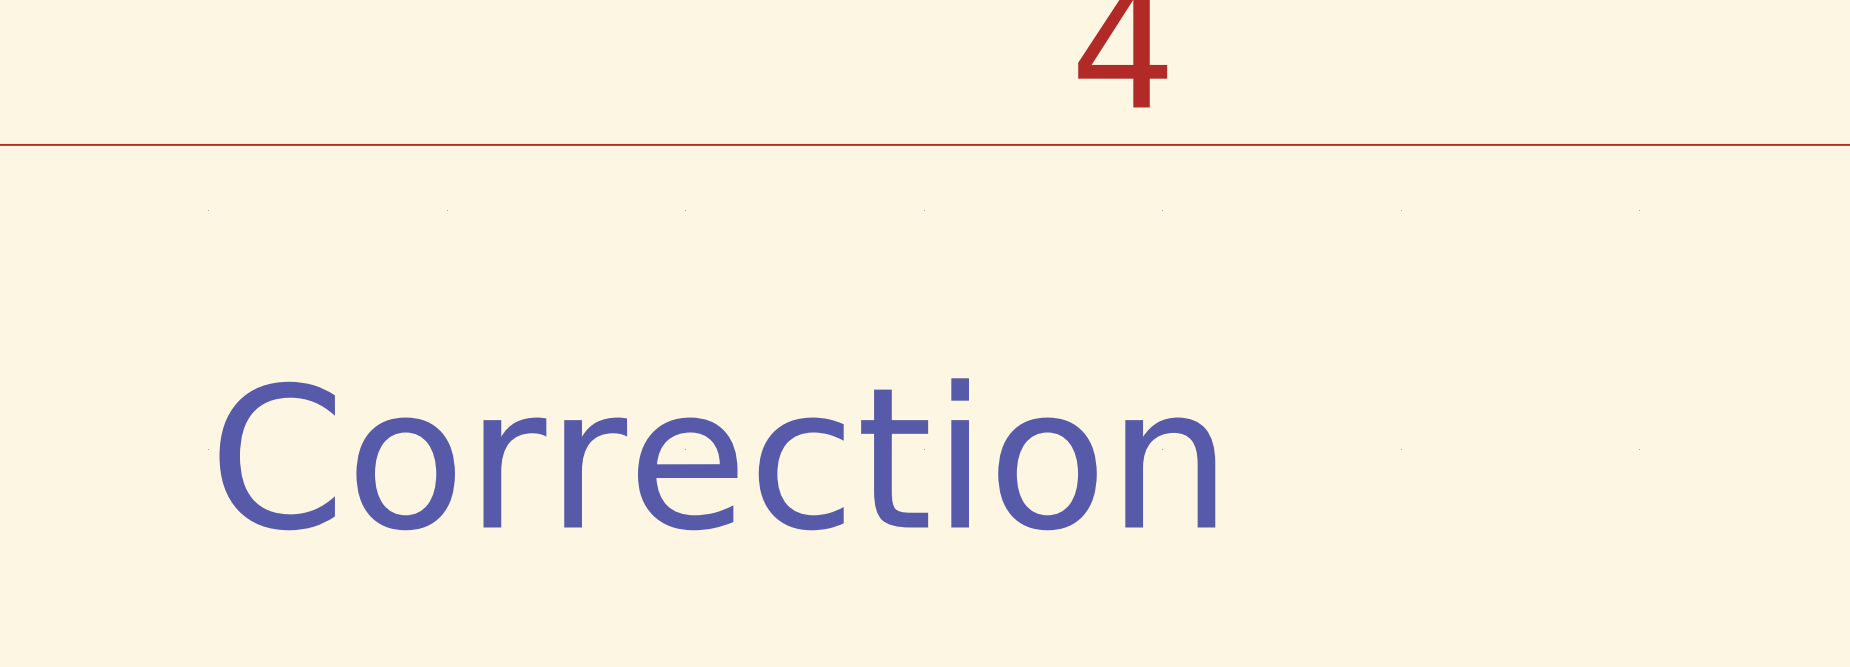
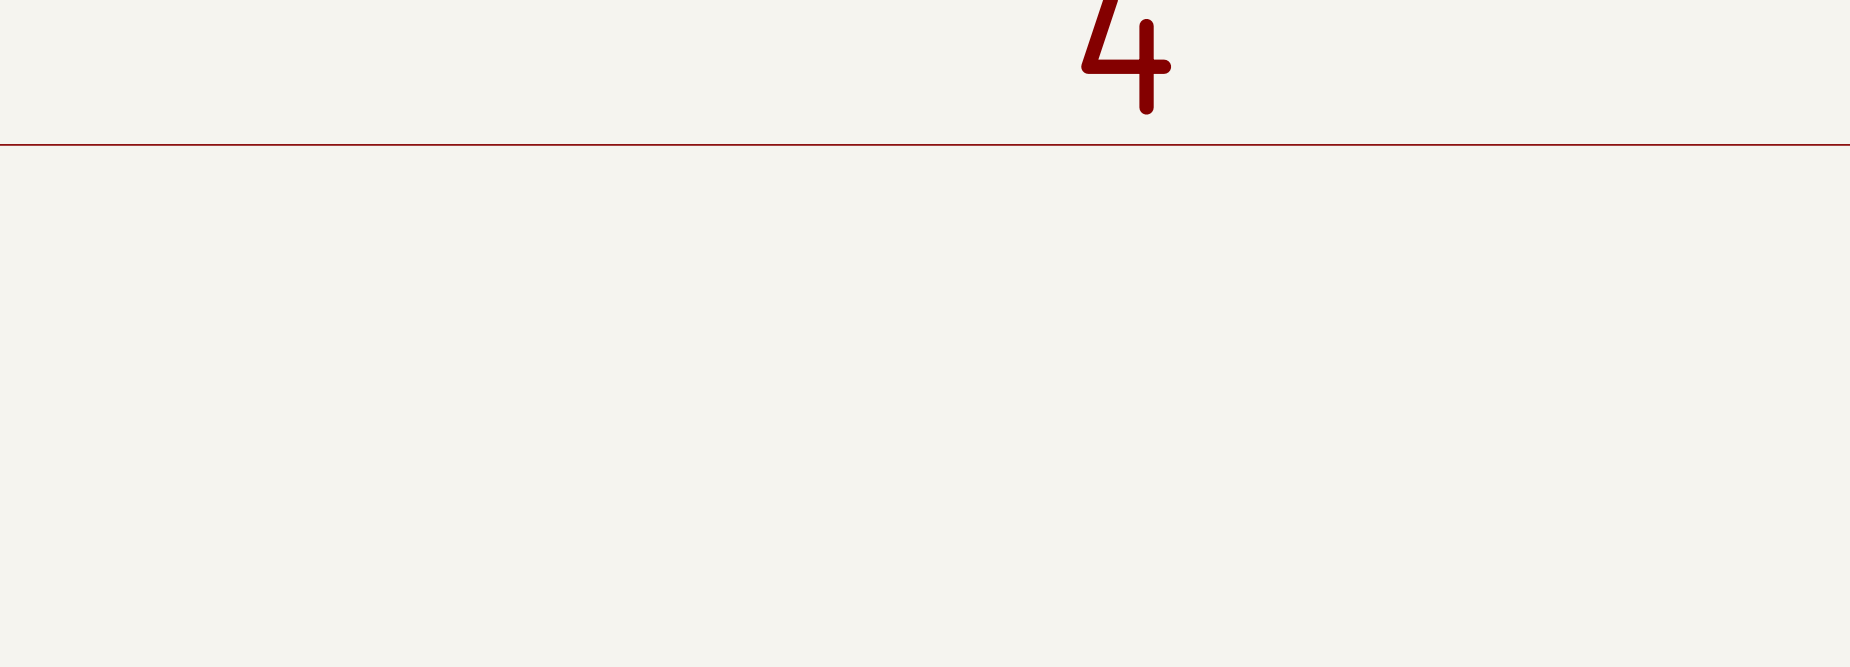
text: Correction (717, 454) -> none

